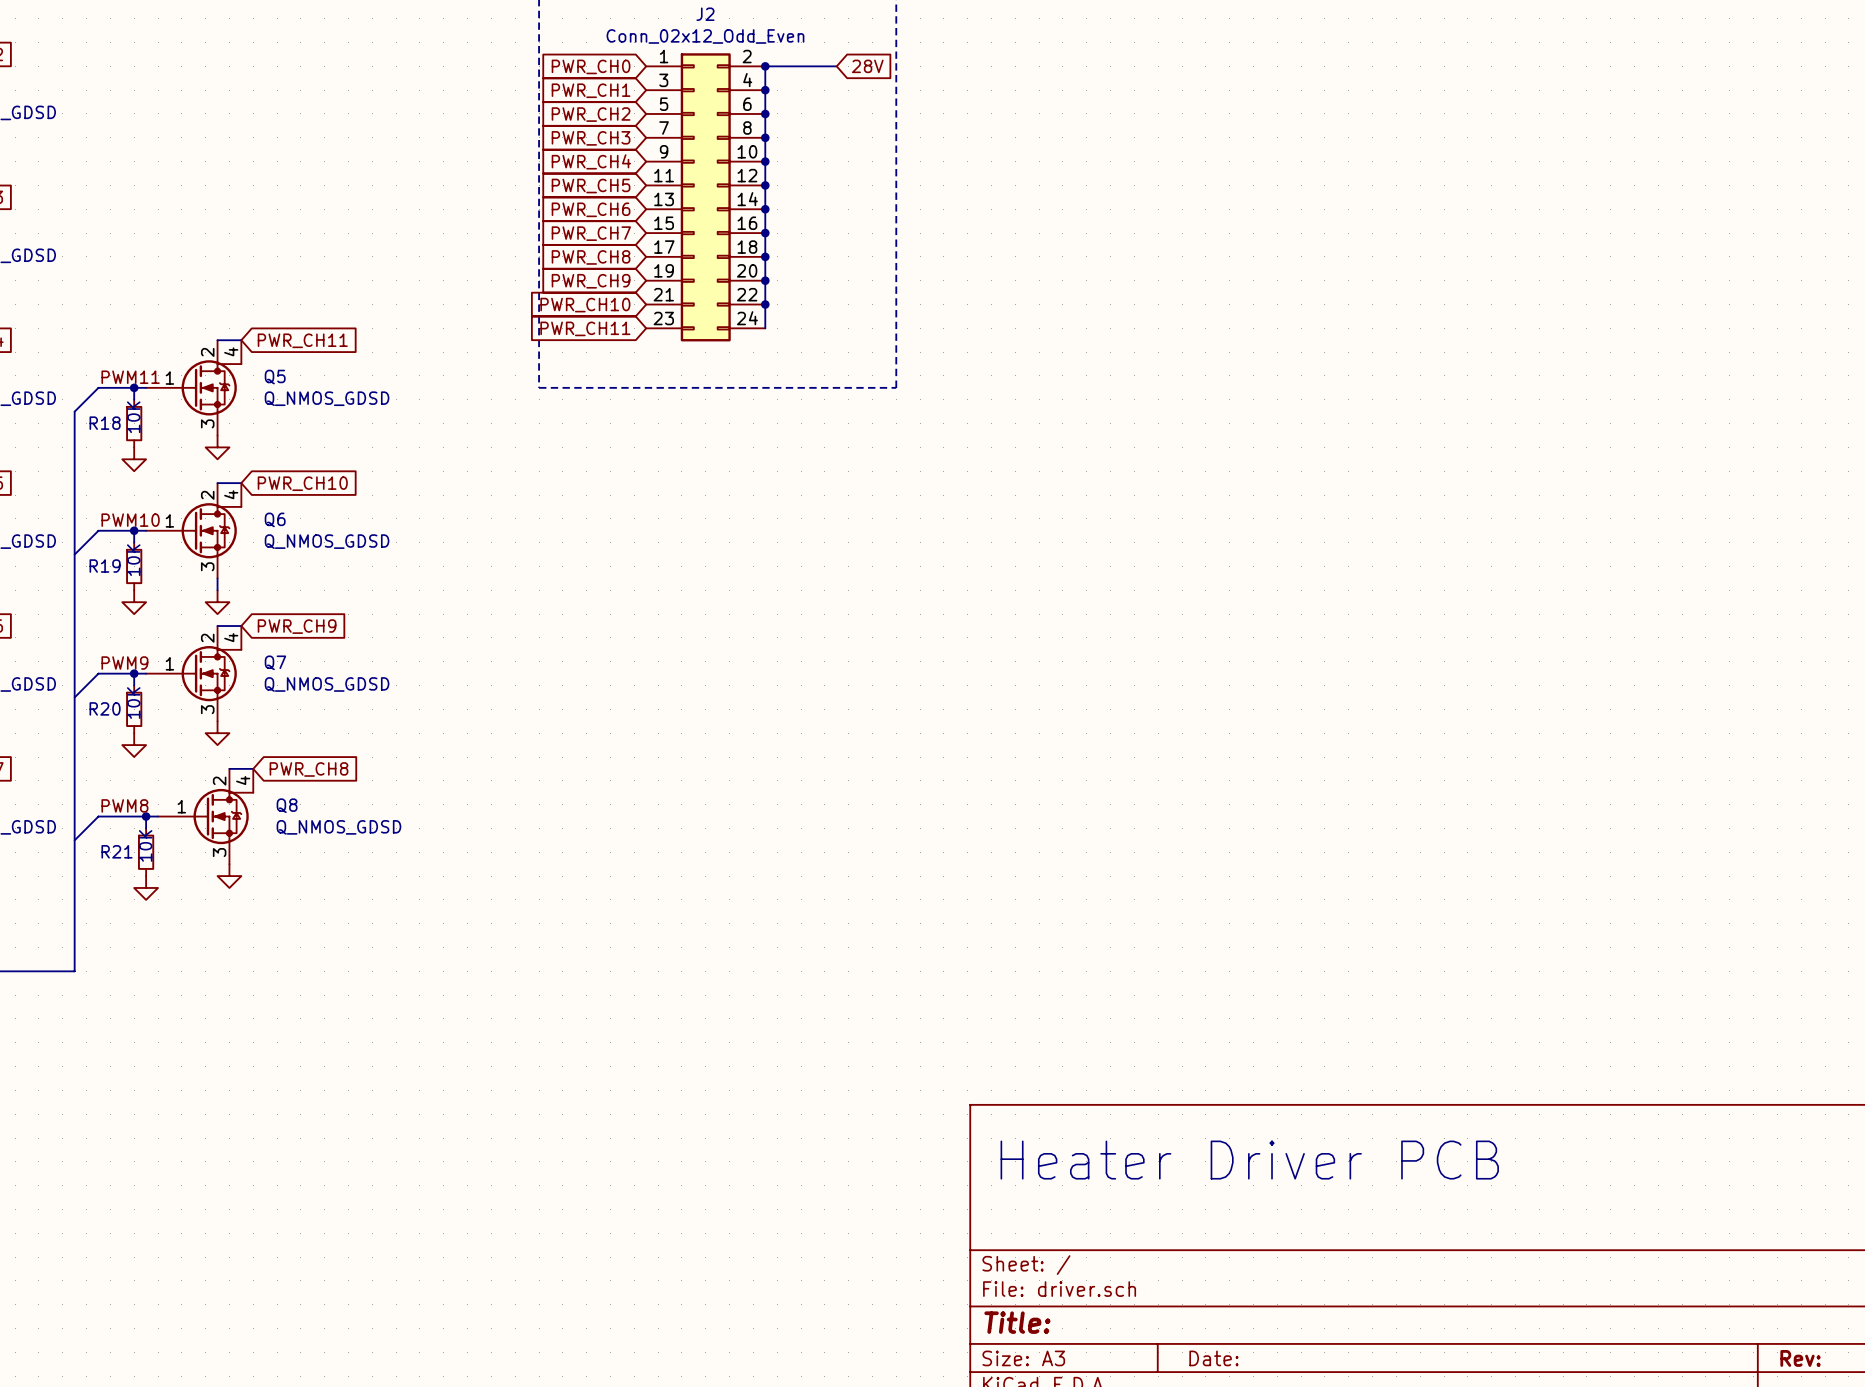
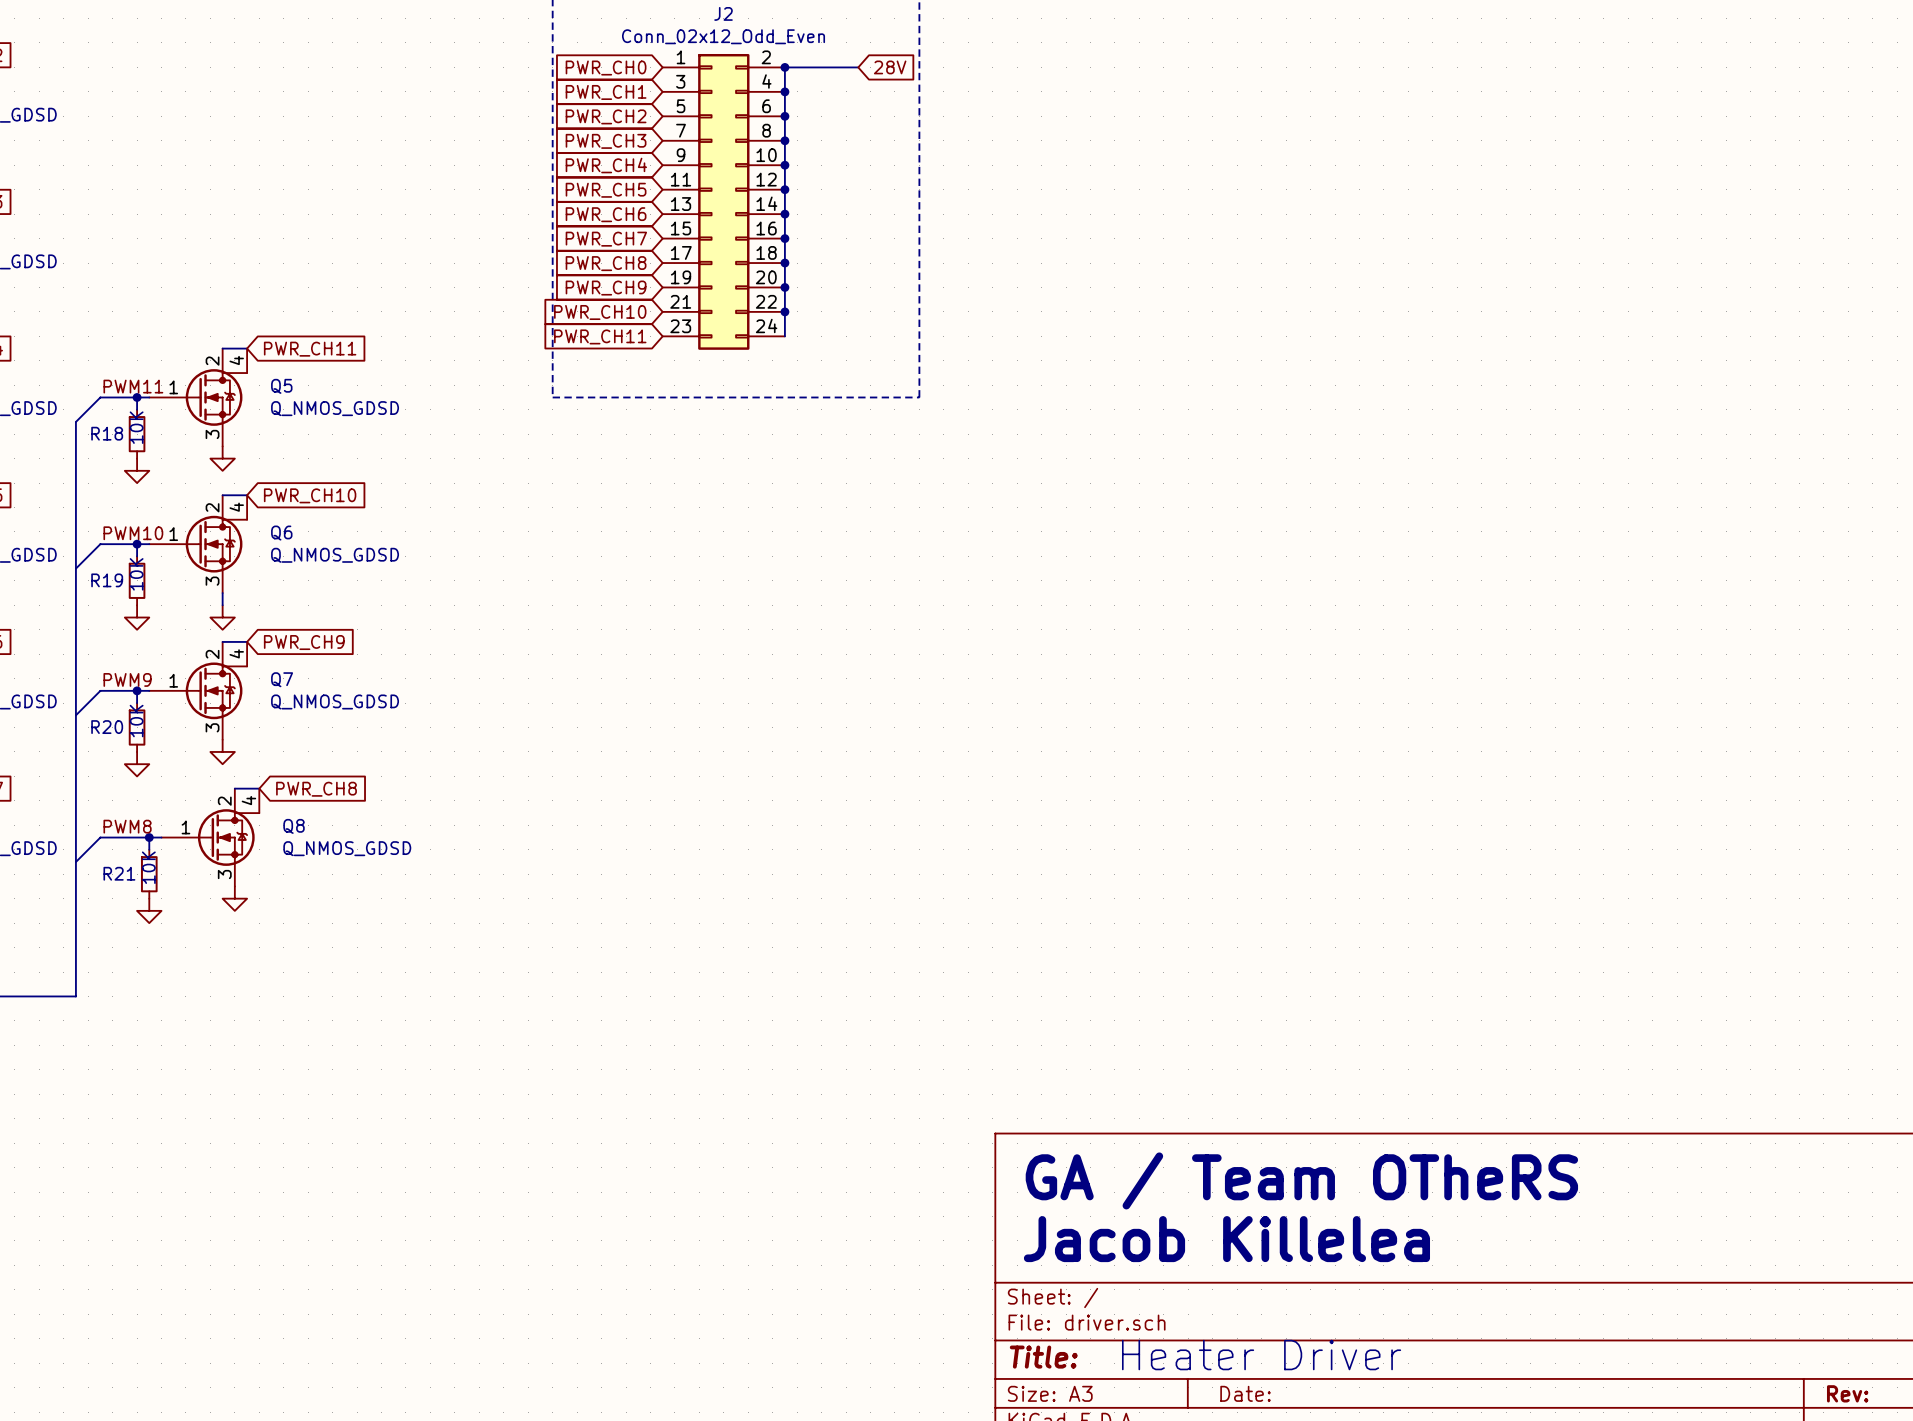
text: none -> GA / Team OTheRS (1301, 1180)
text: Heater Driver PCB (1249, 1160) -> none
text: none -> Jacob Killelea (1226, 1239)
text: none -> Heater Driver (1261, 1355)

